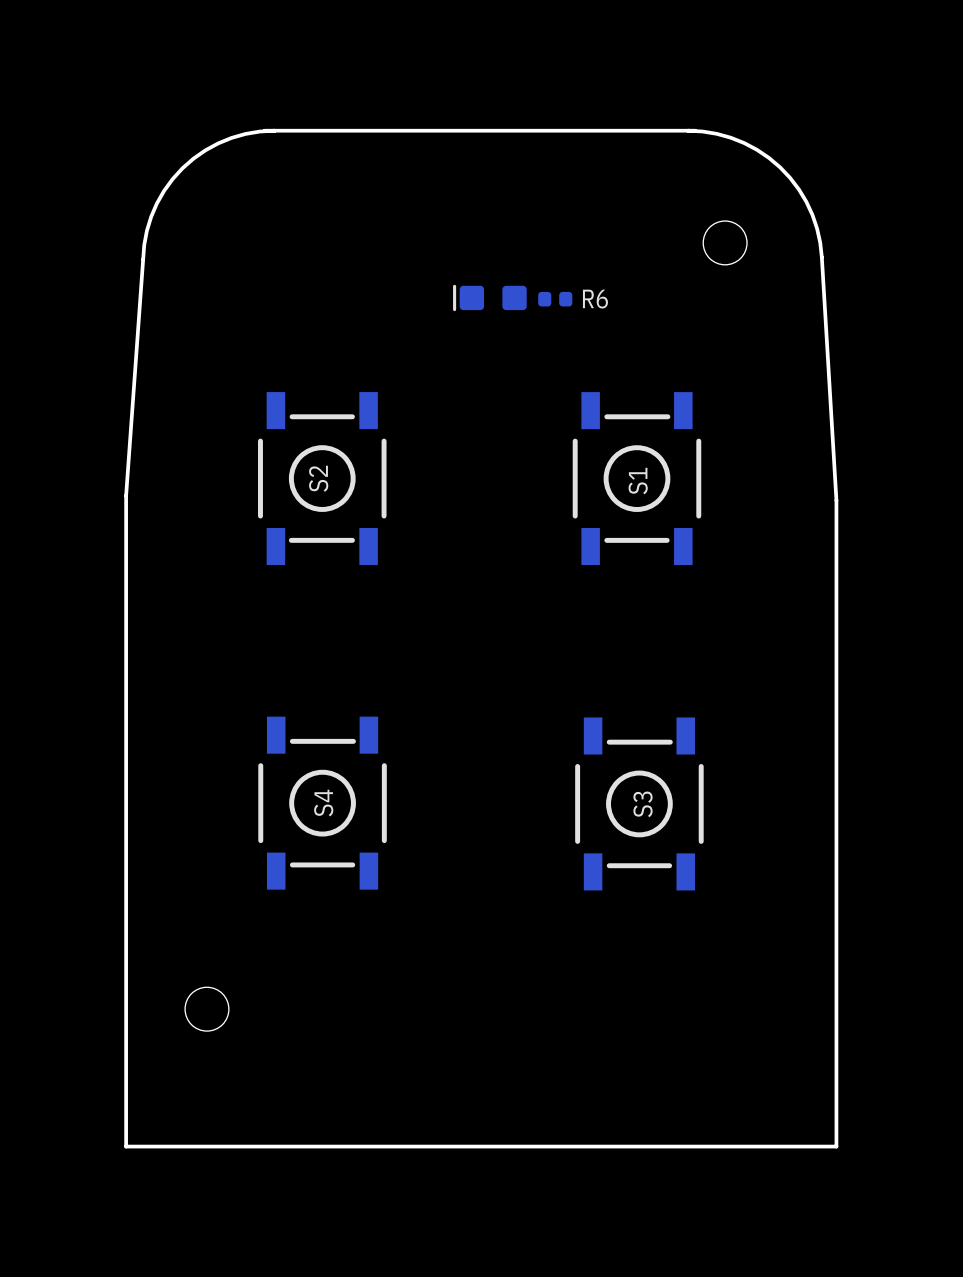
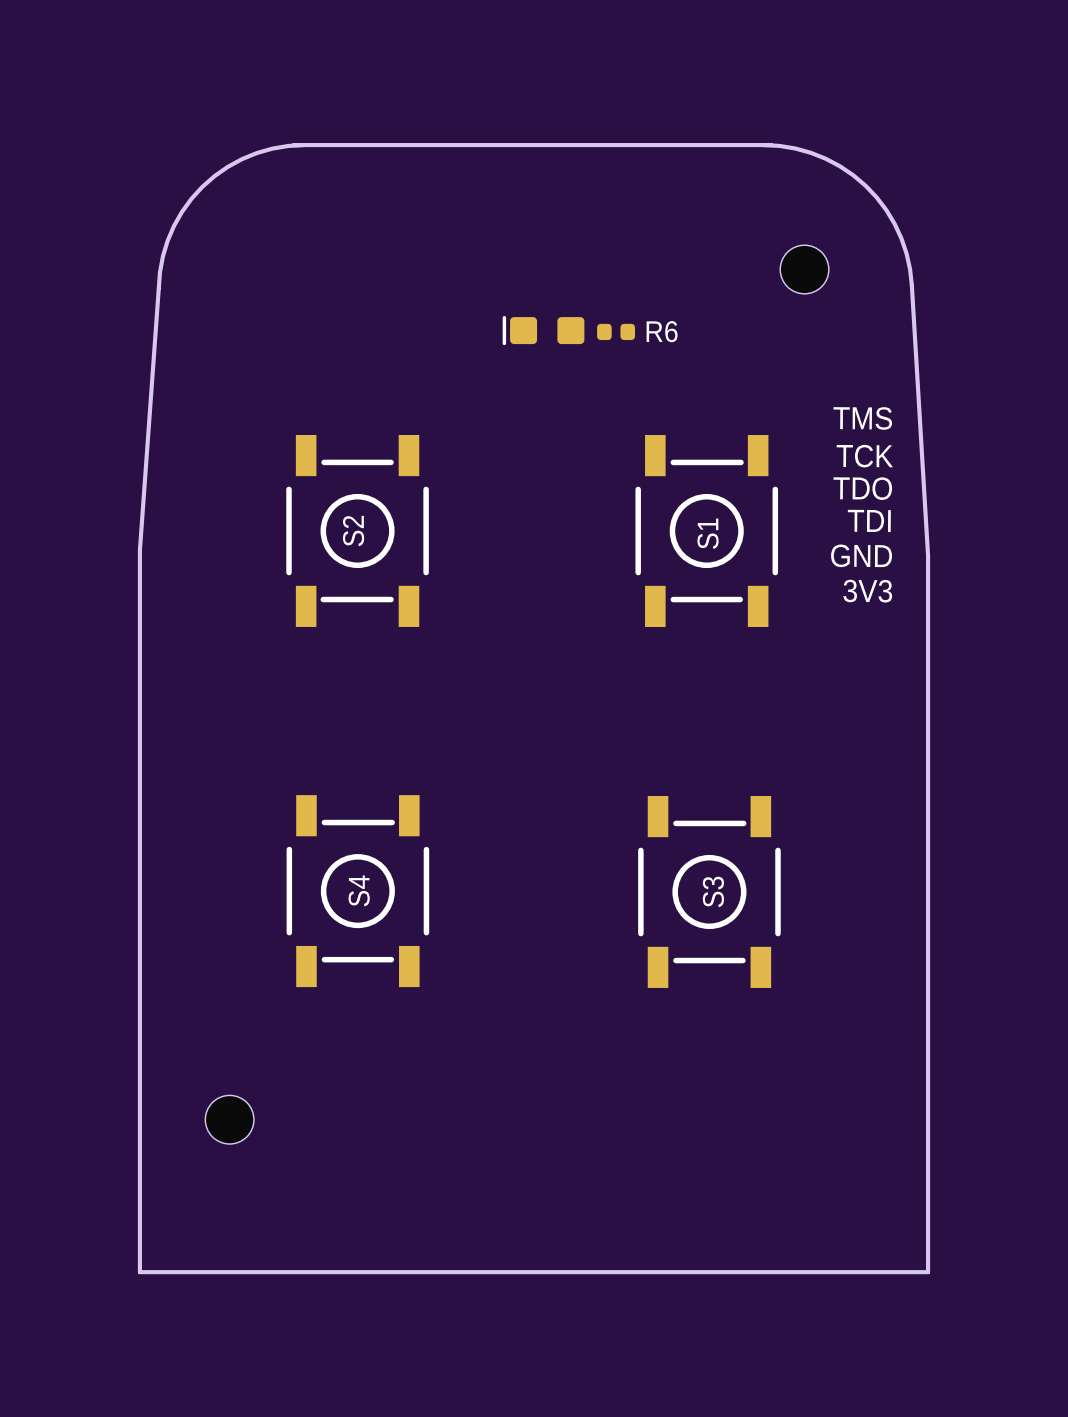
text: none -> TMS (862, 418)
text: none -> TCK (864, 456)
text: none -> TDO (862, 488)
text: none -> TDI (869, 520)
text: none -> GND (861, 555)
text: none -> 3V3 (867, 591)

